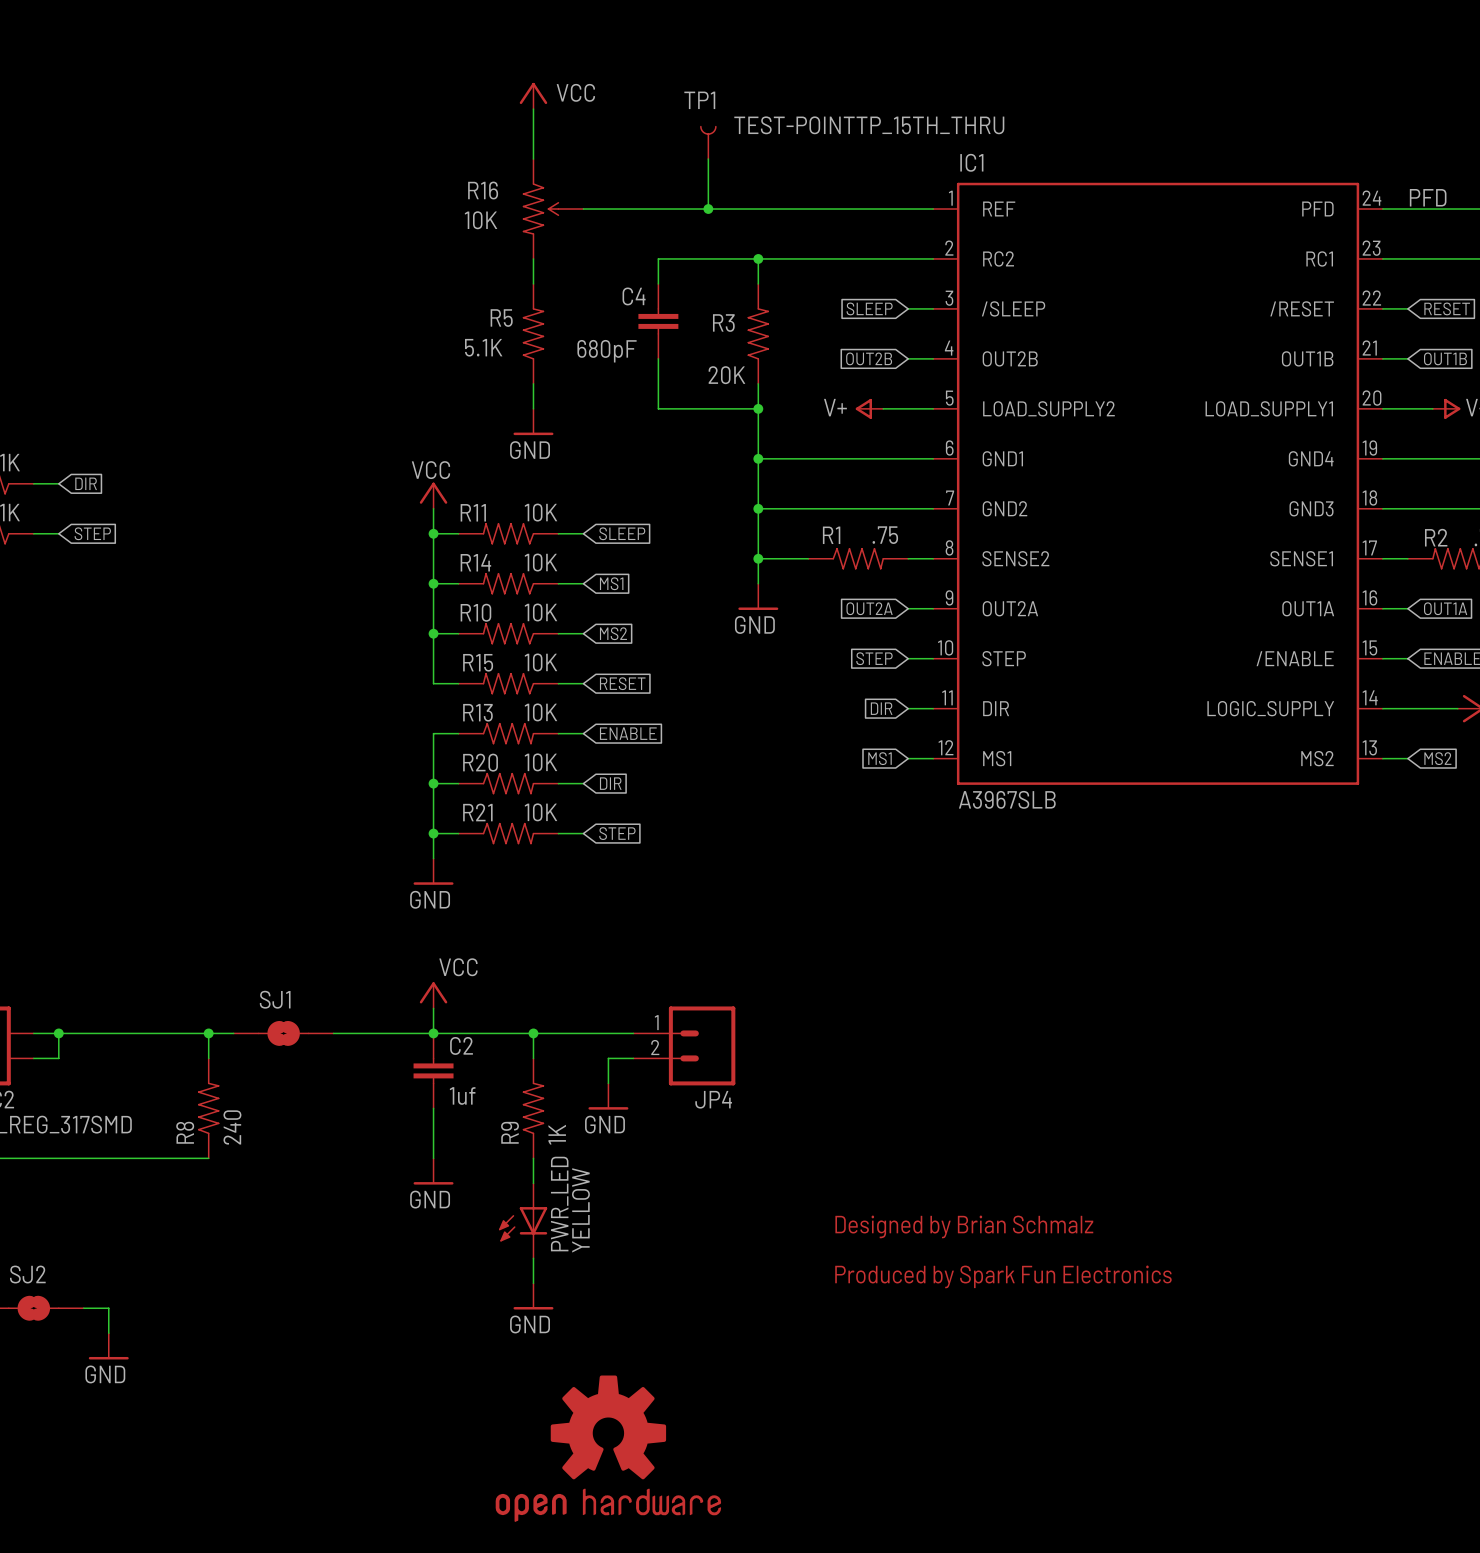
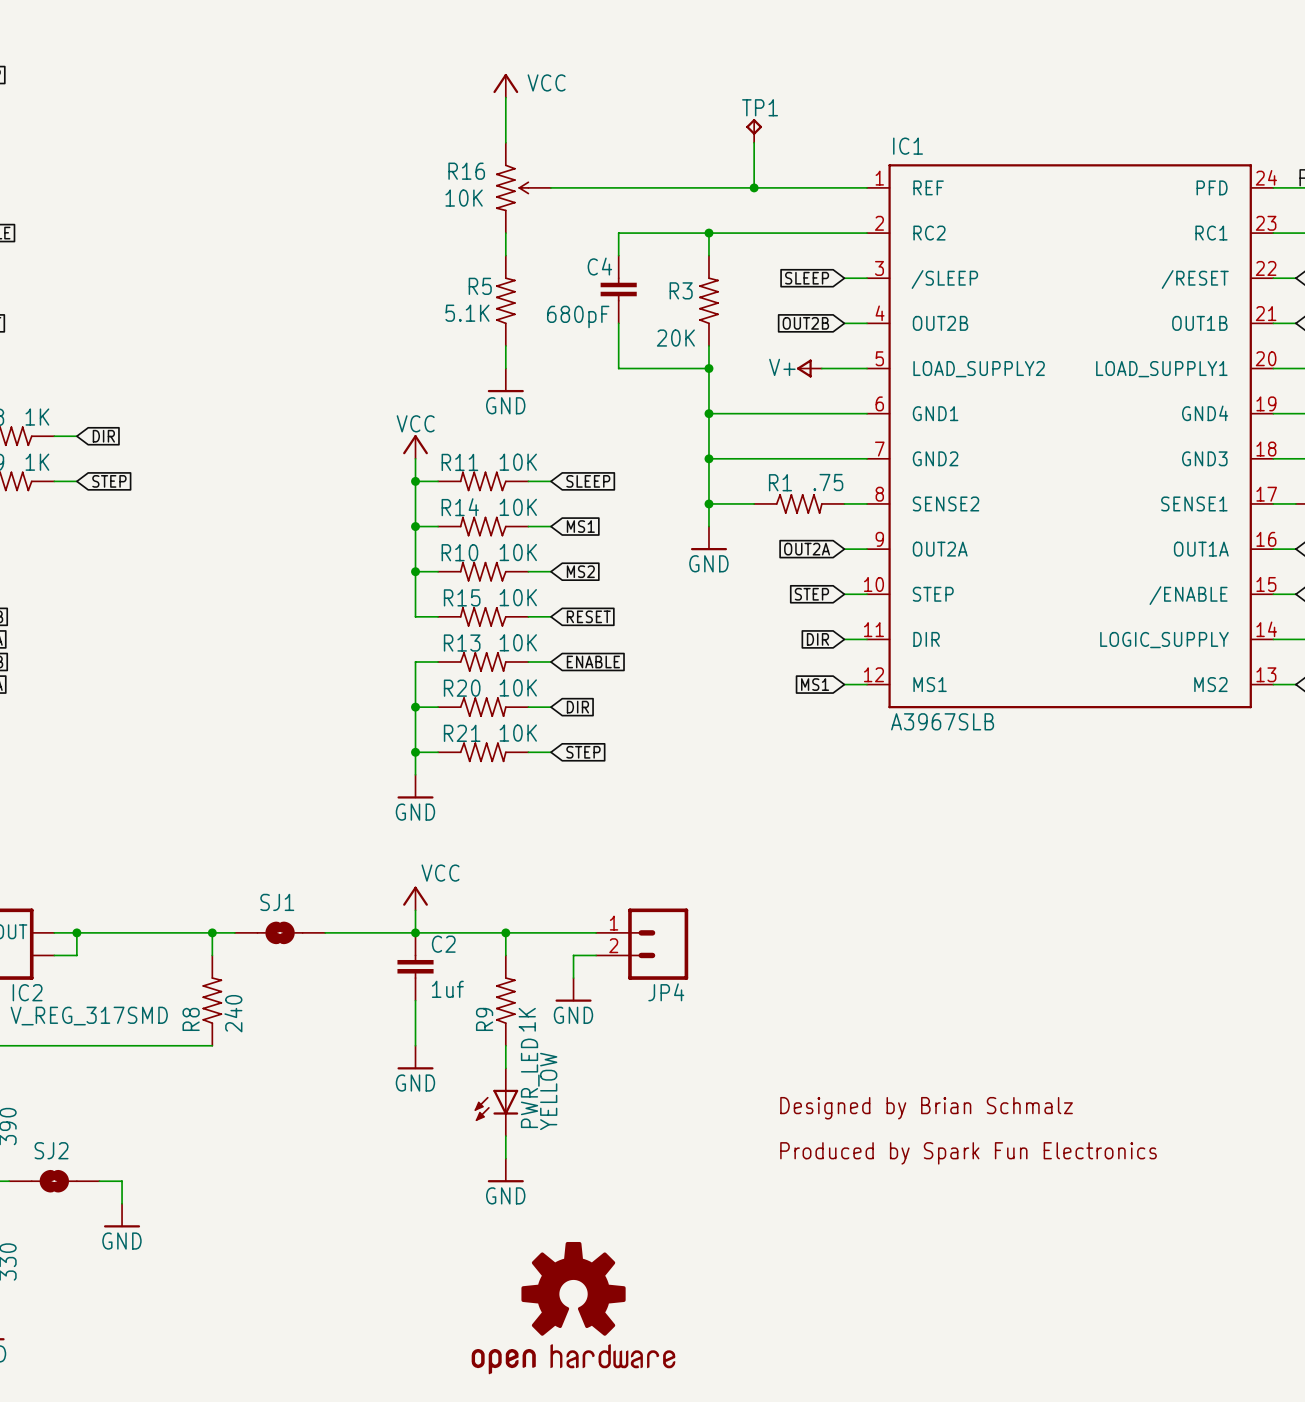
TP1 symbol: [700, 125, 717, 160] -> [746, 119, 763, 143]
TP1 value: TEST-POINTTP_15TH_THRU (869, 125) -> none
wire: (708, 159) (708, 209) -> (754, 142) (754, 187)
junction: (708, 209) -> none
junction: none -> (754, 187)

